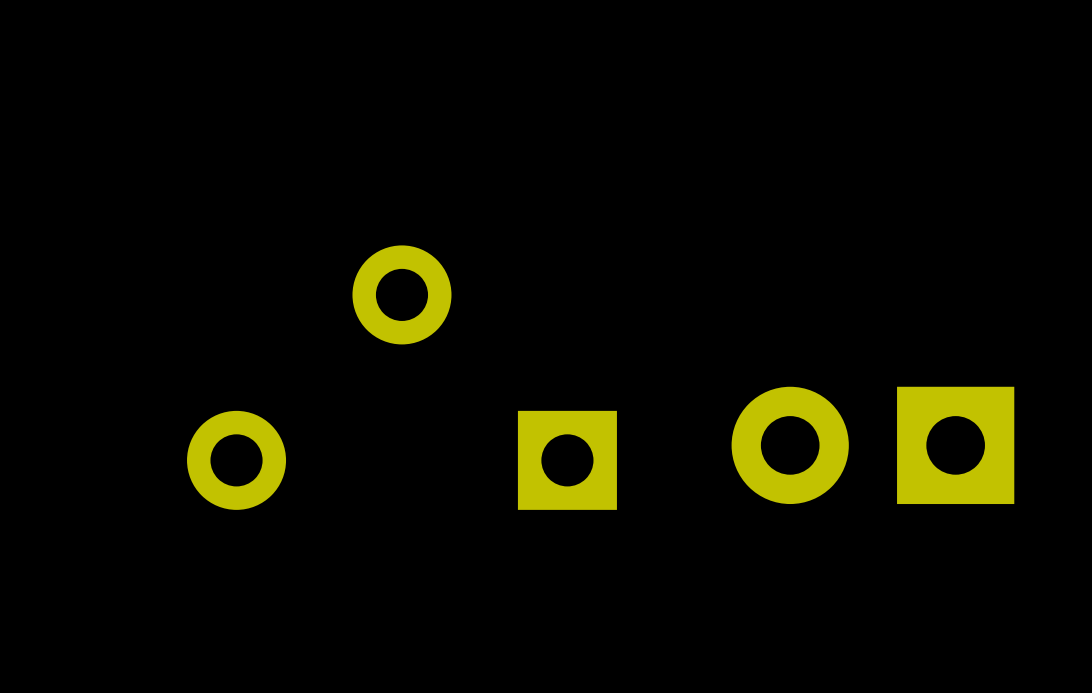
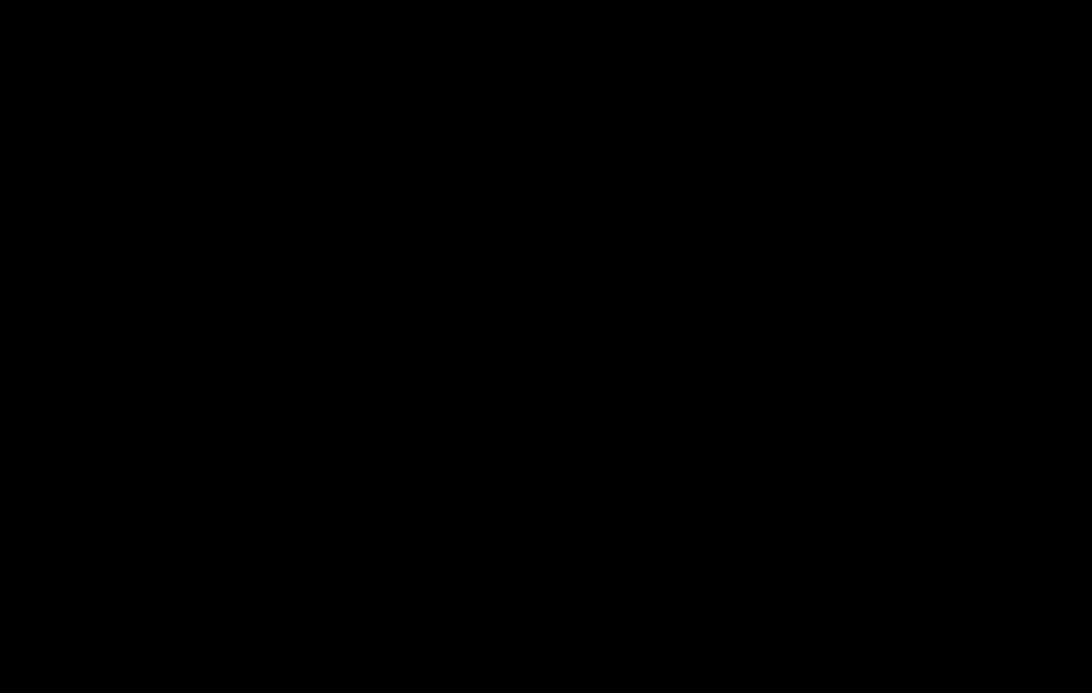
part: (401, 377) -> none
part: (872, 445) -> none

